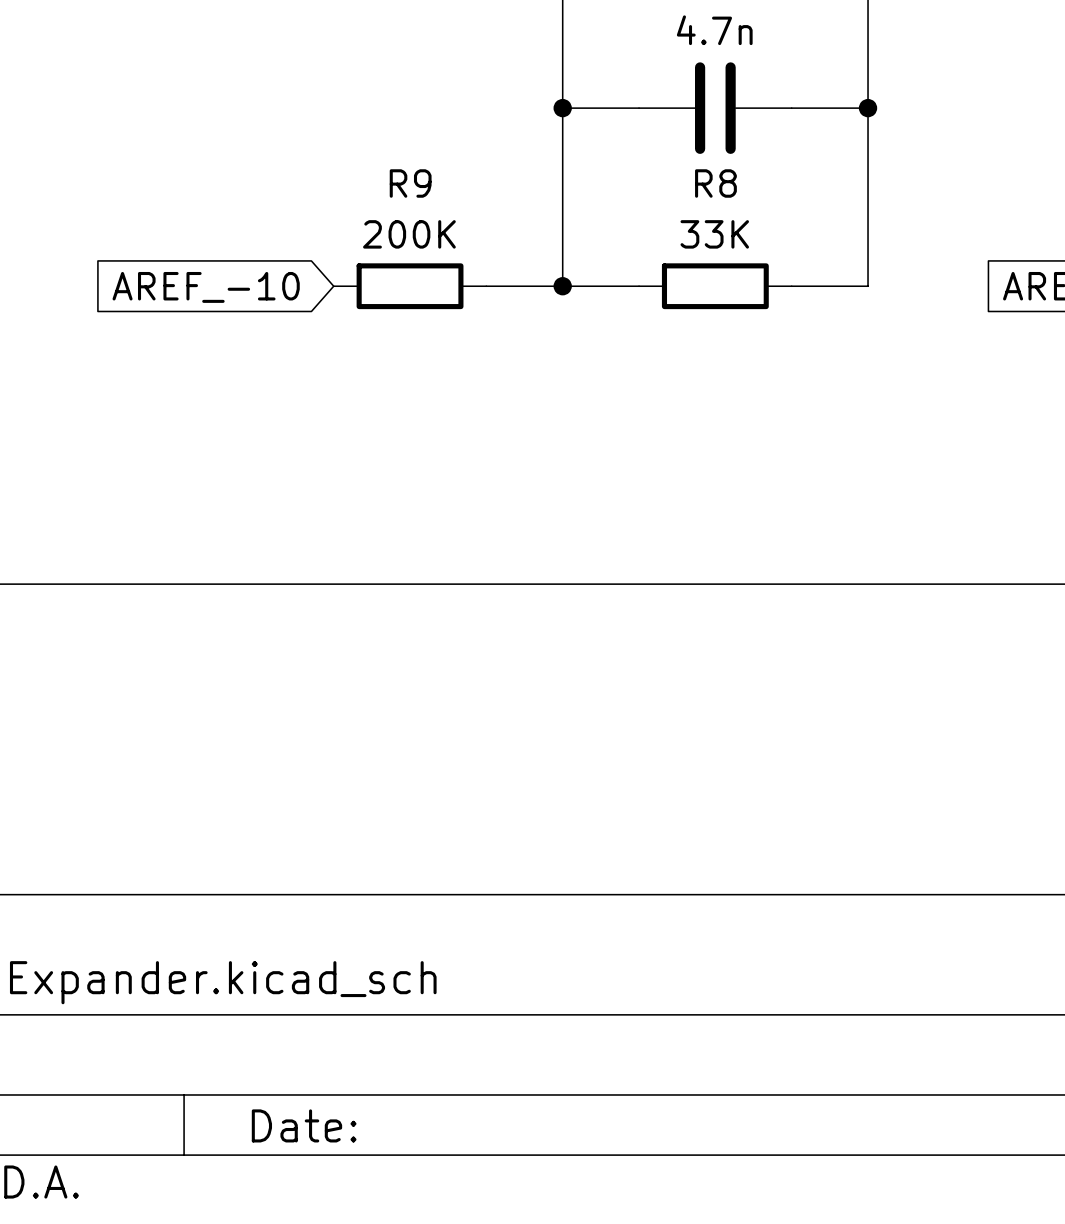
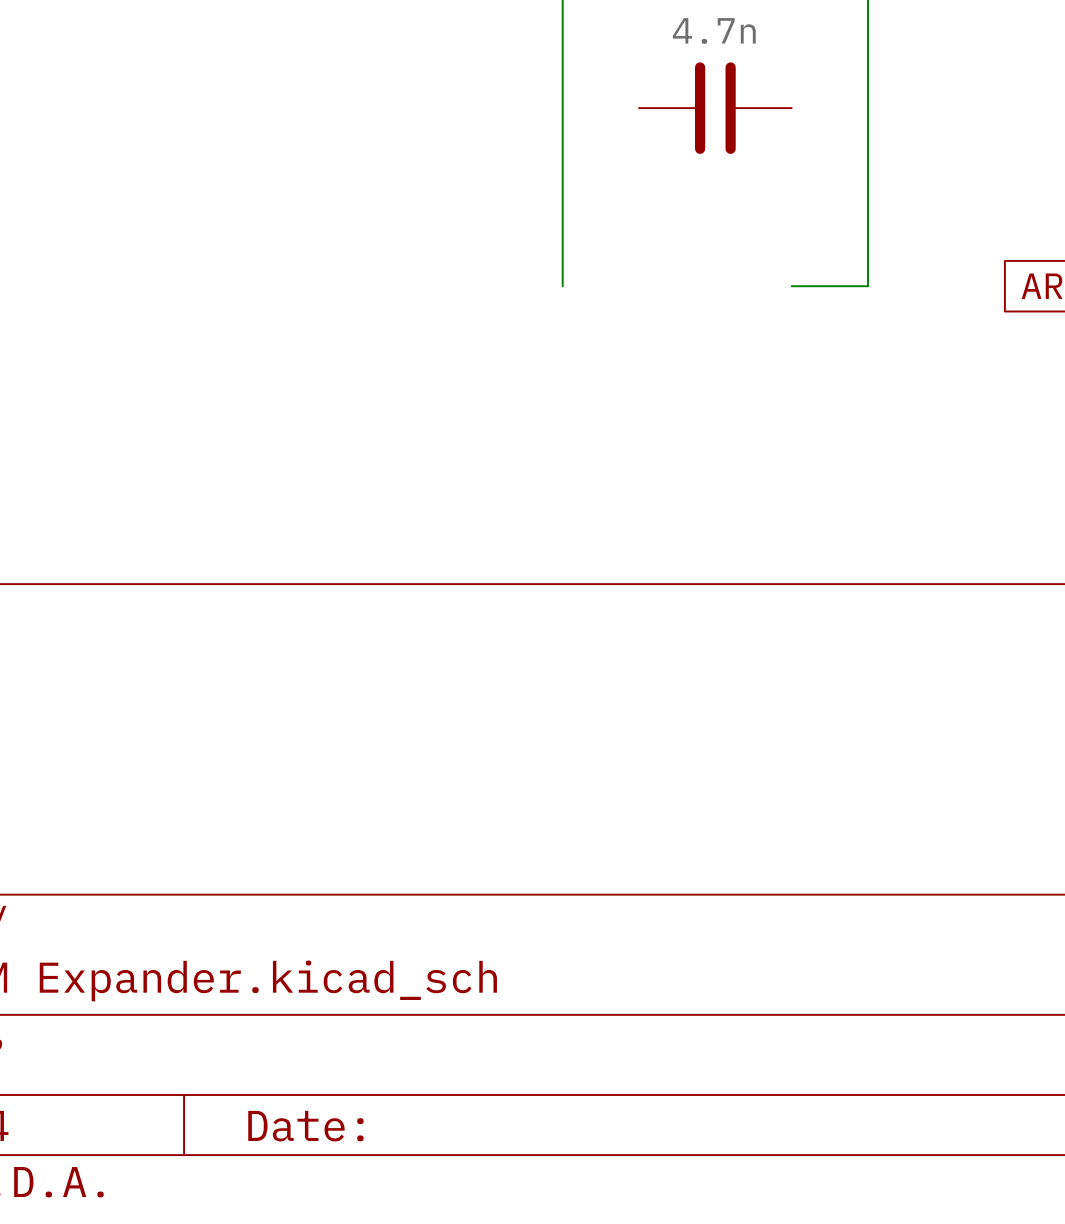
wire: (562, 108) (639, 108) -> none
junction: (562, 108) -> none
wire: (791, 108) (868, 108) -> none
junction: (868, 108) -> none
R9: 200K (410, 286) -> none
wire: (486, 286) (639, 286) -> none
junction: (562, 286) -> none
R8: 33K (715, 286) -> none
global label: AREF_-10 (206, 287) -> none

